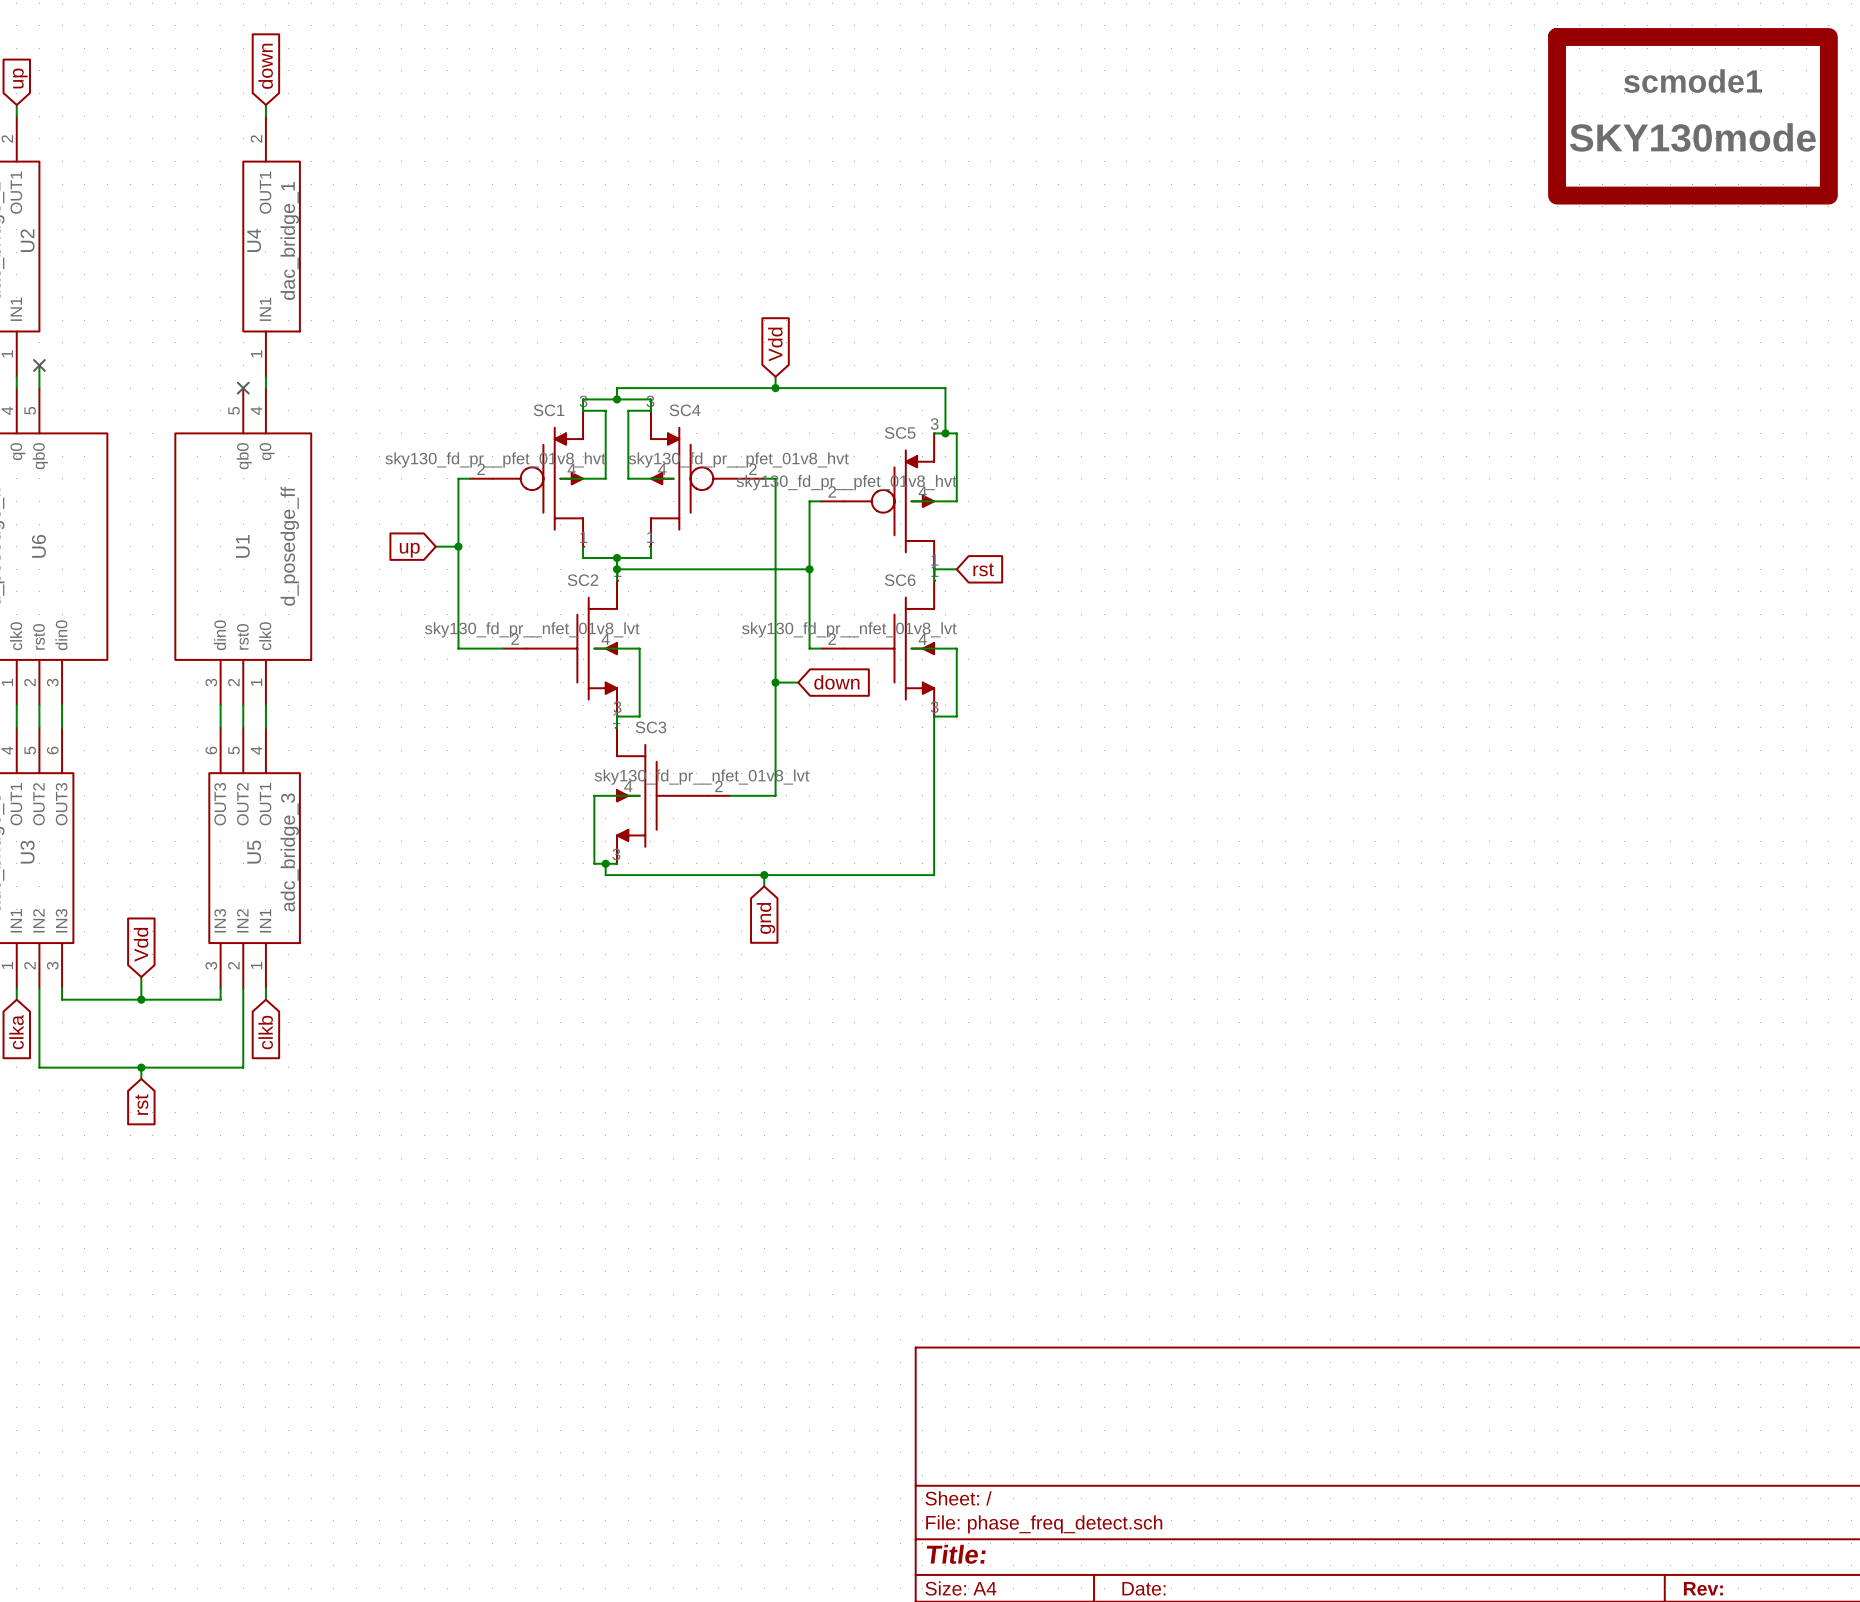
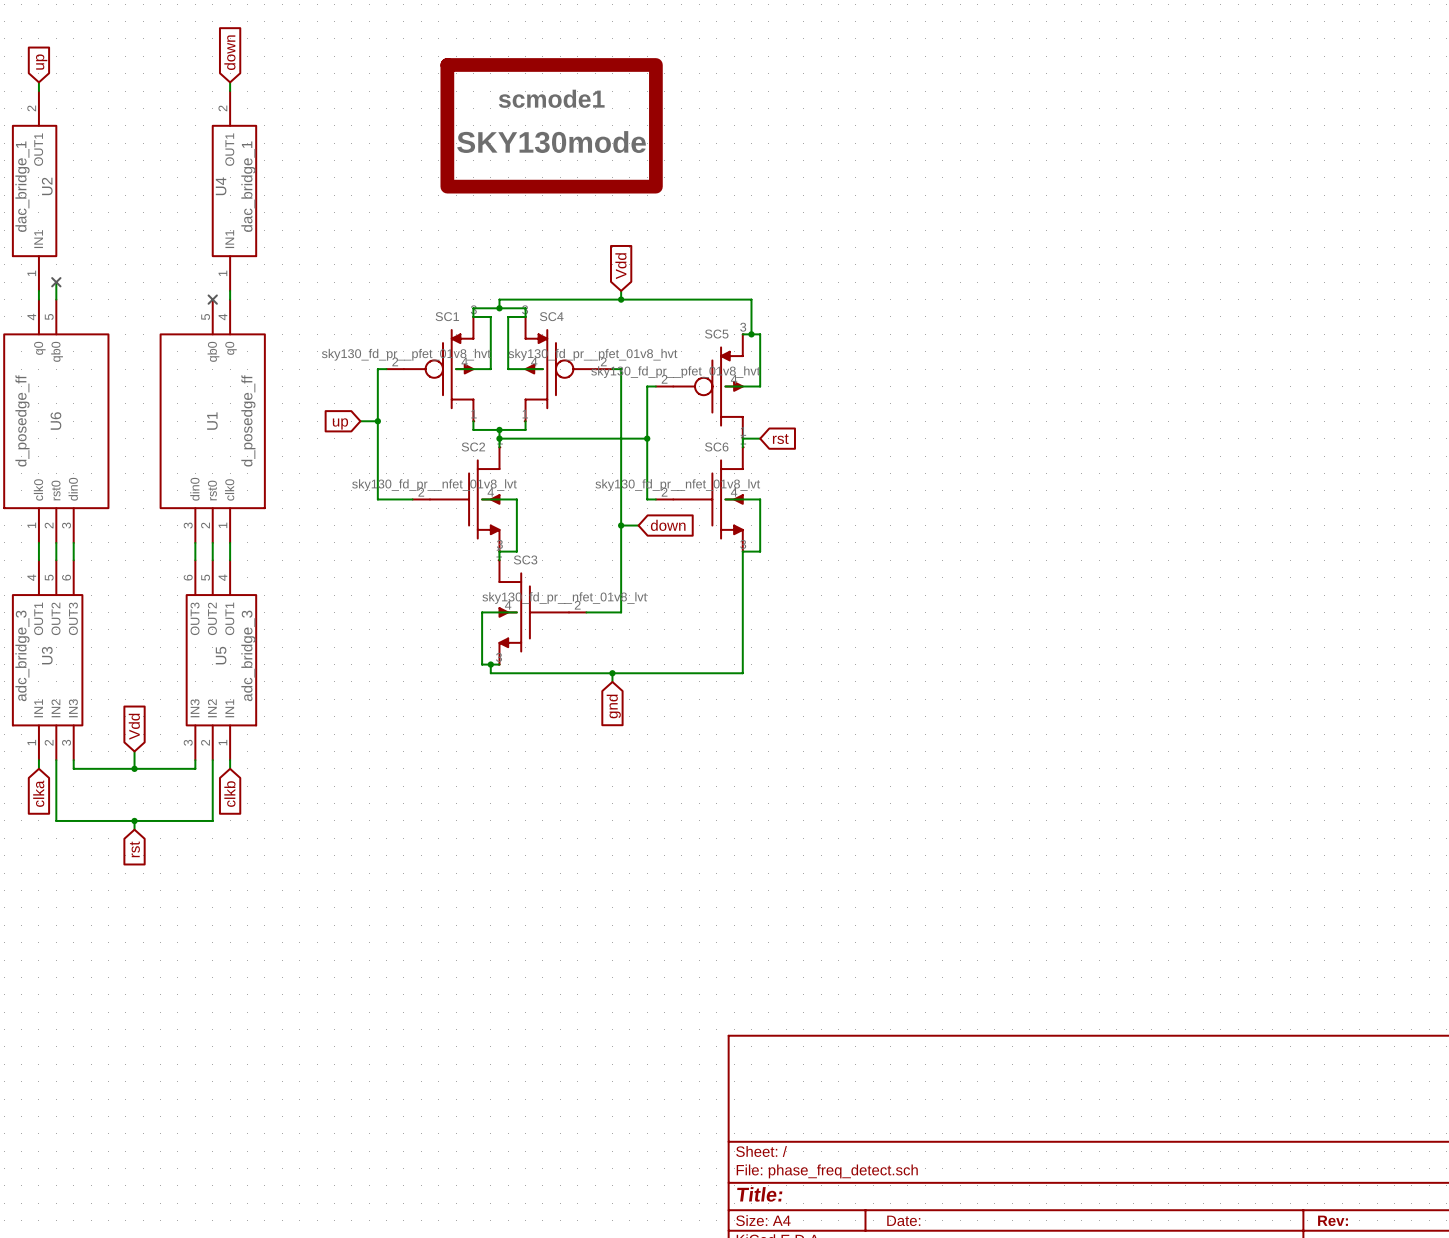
scmode1 position: (1692, 116) -> (551, 125)

